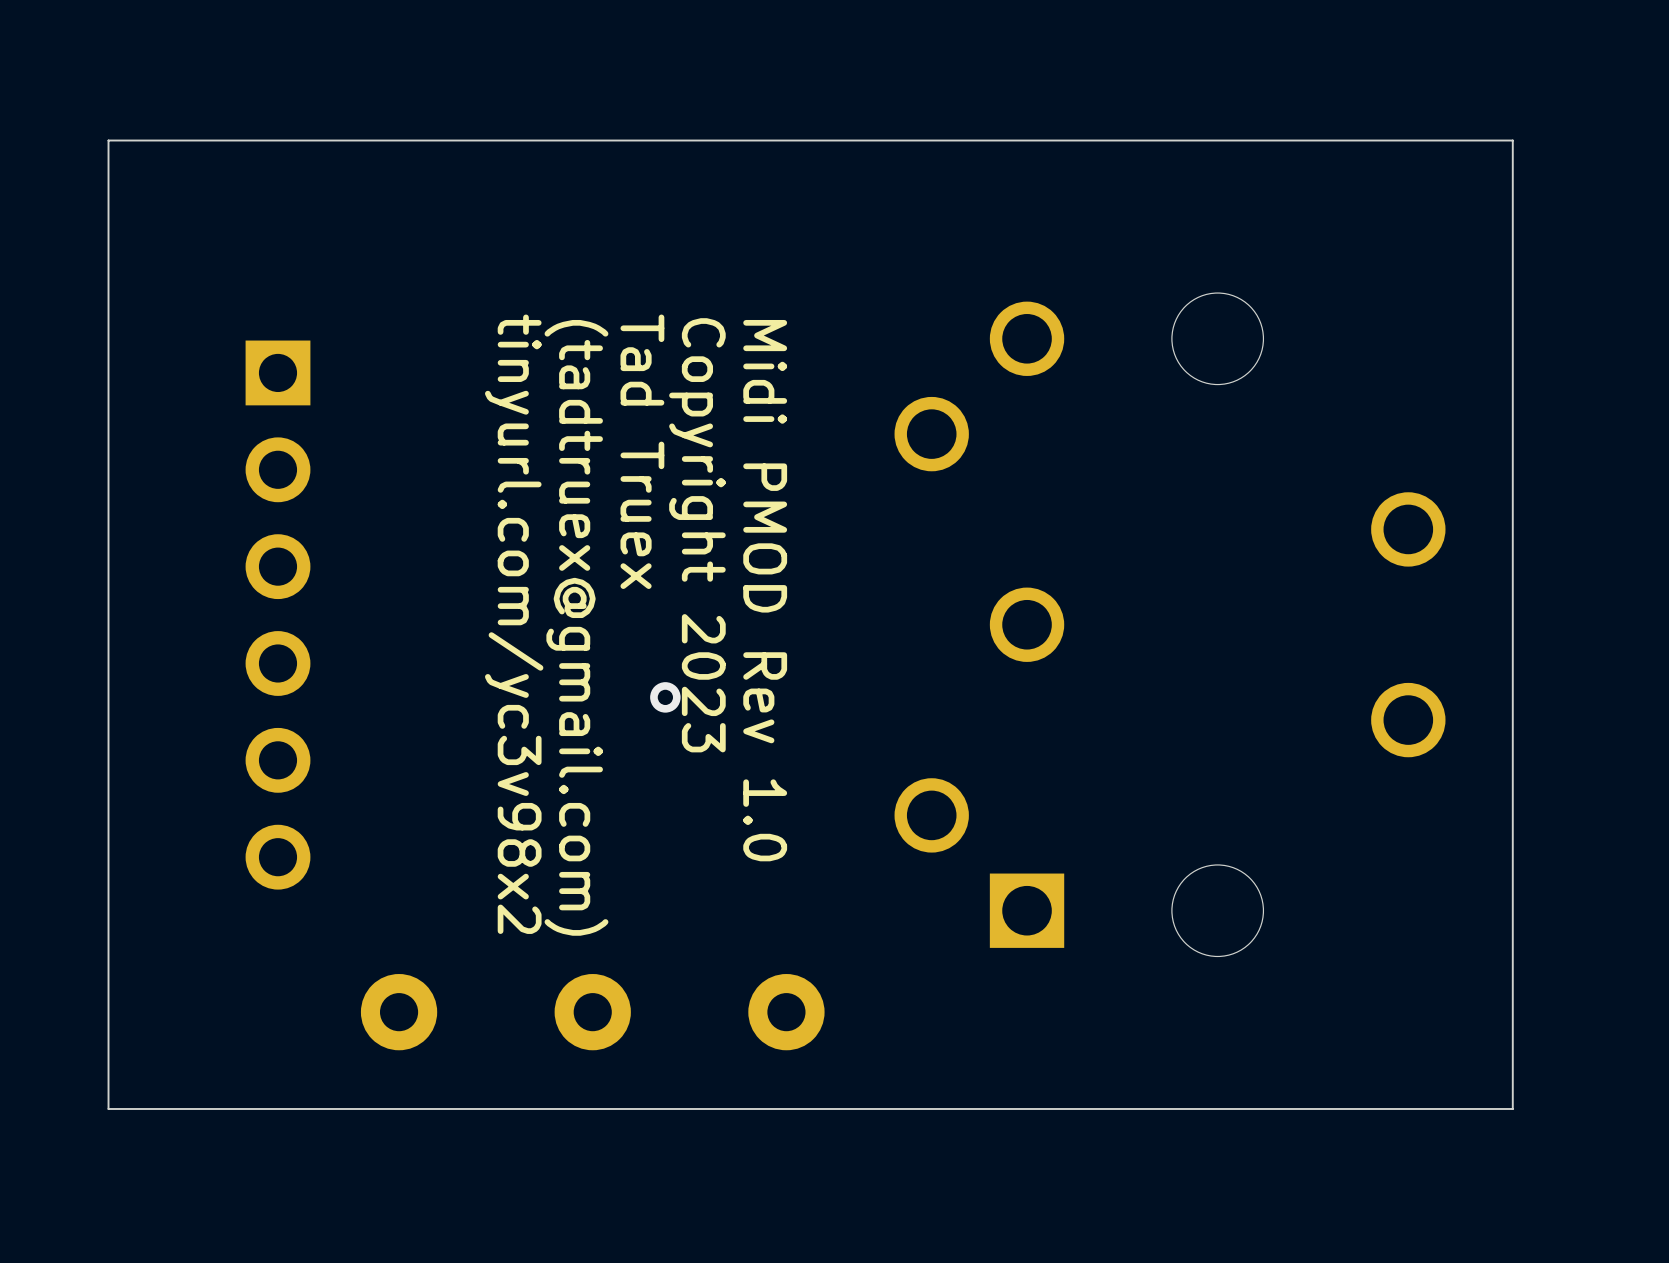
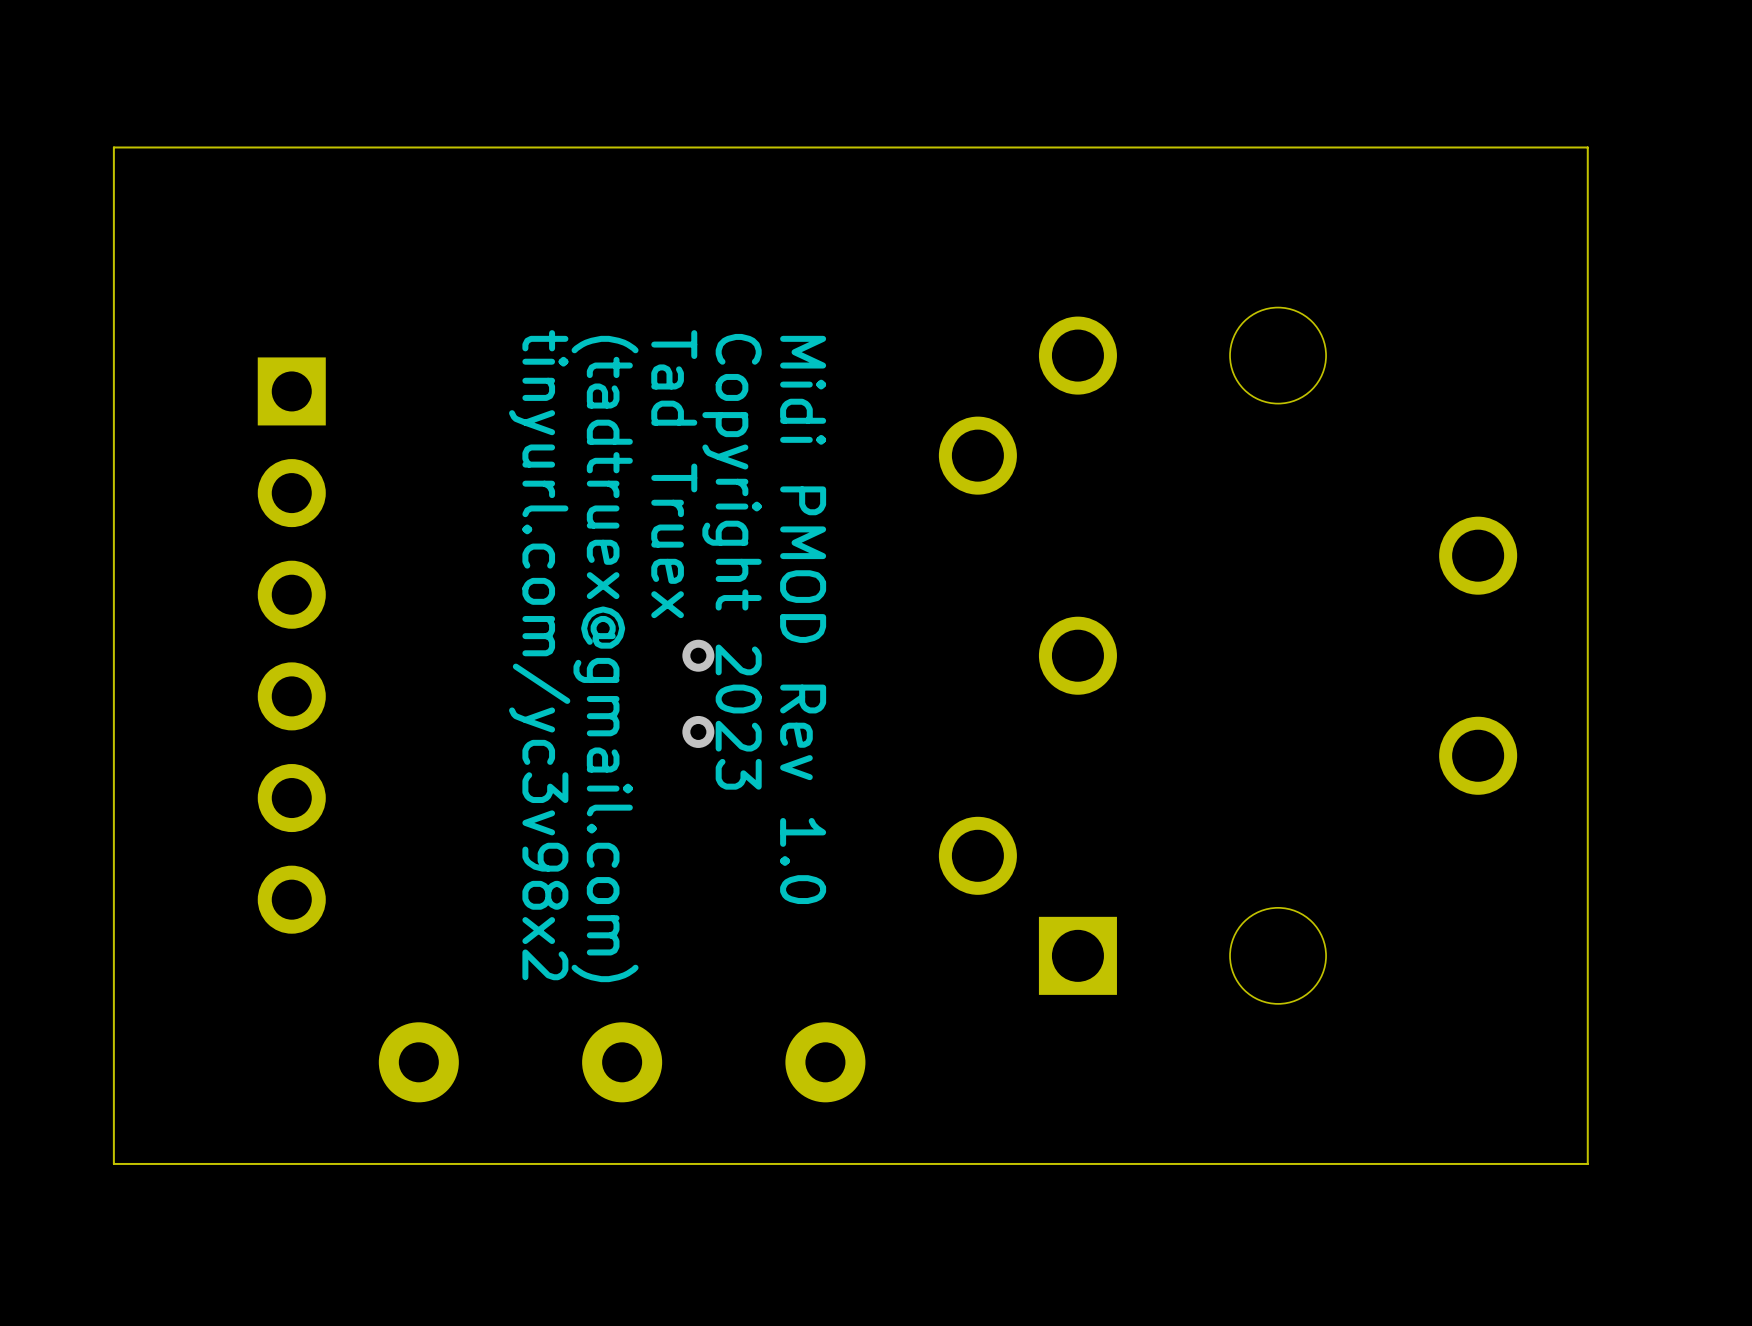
via: none -> (698, 655)

